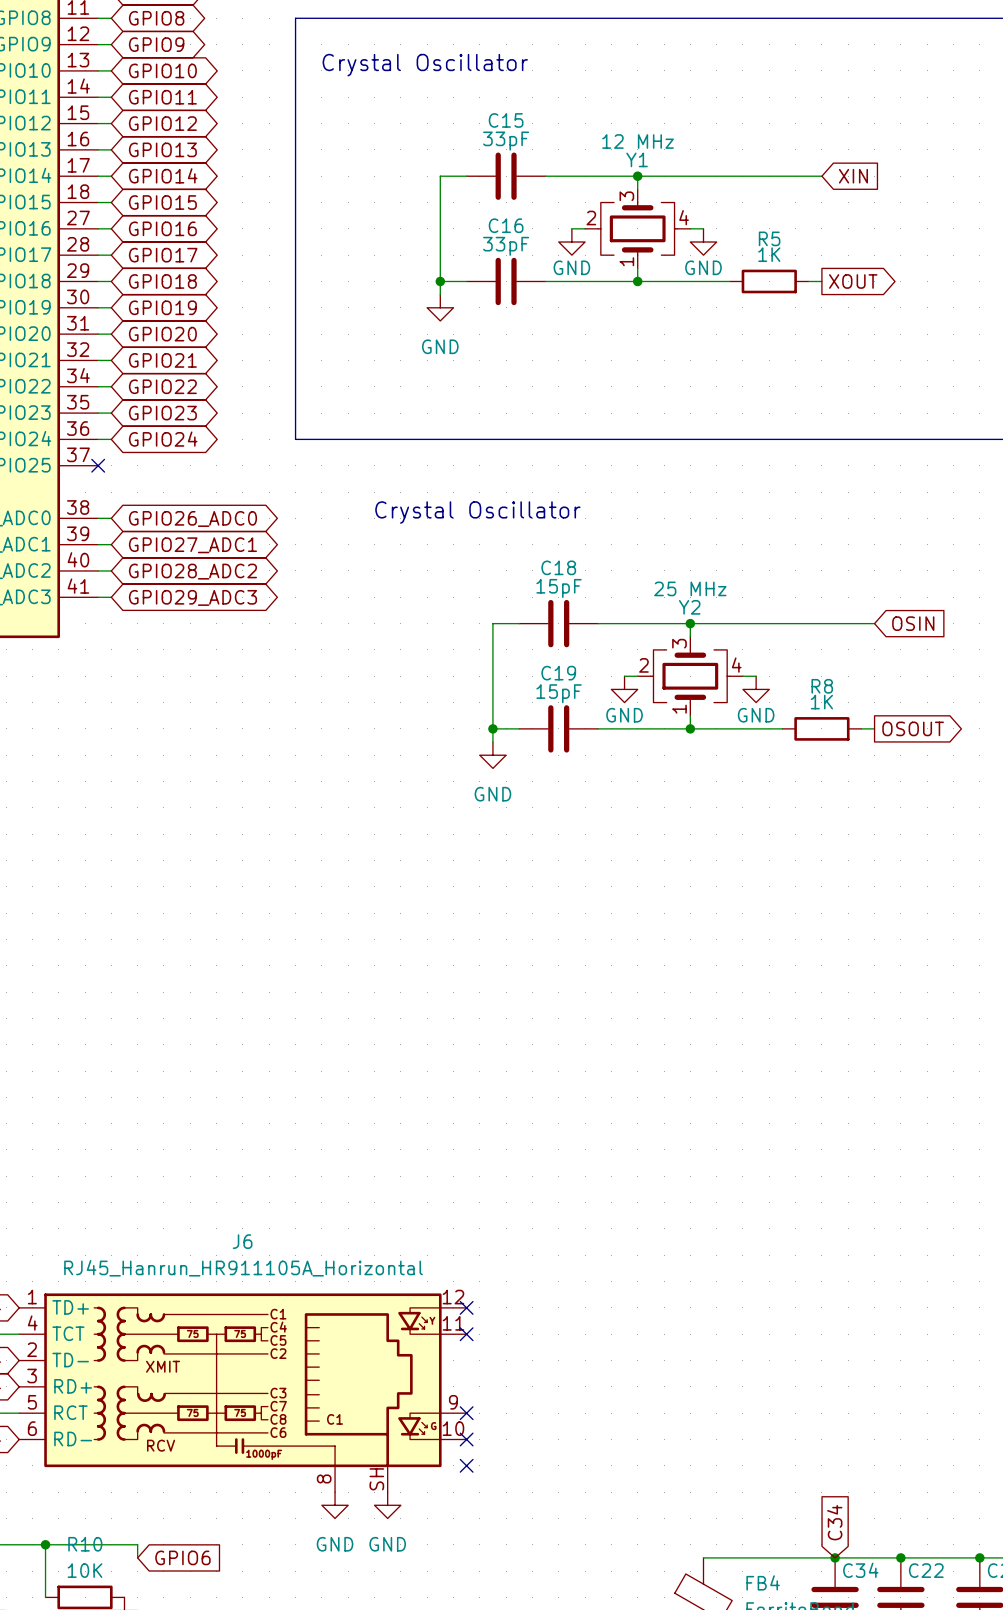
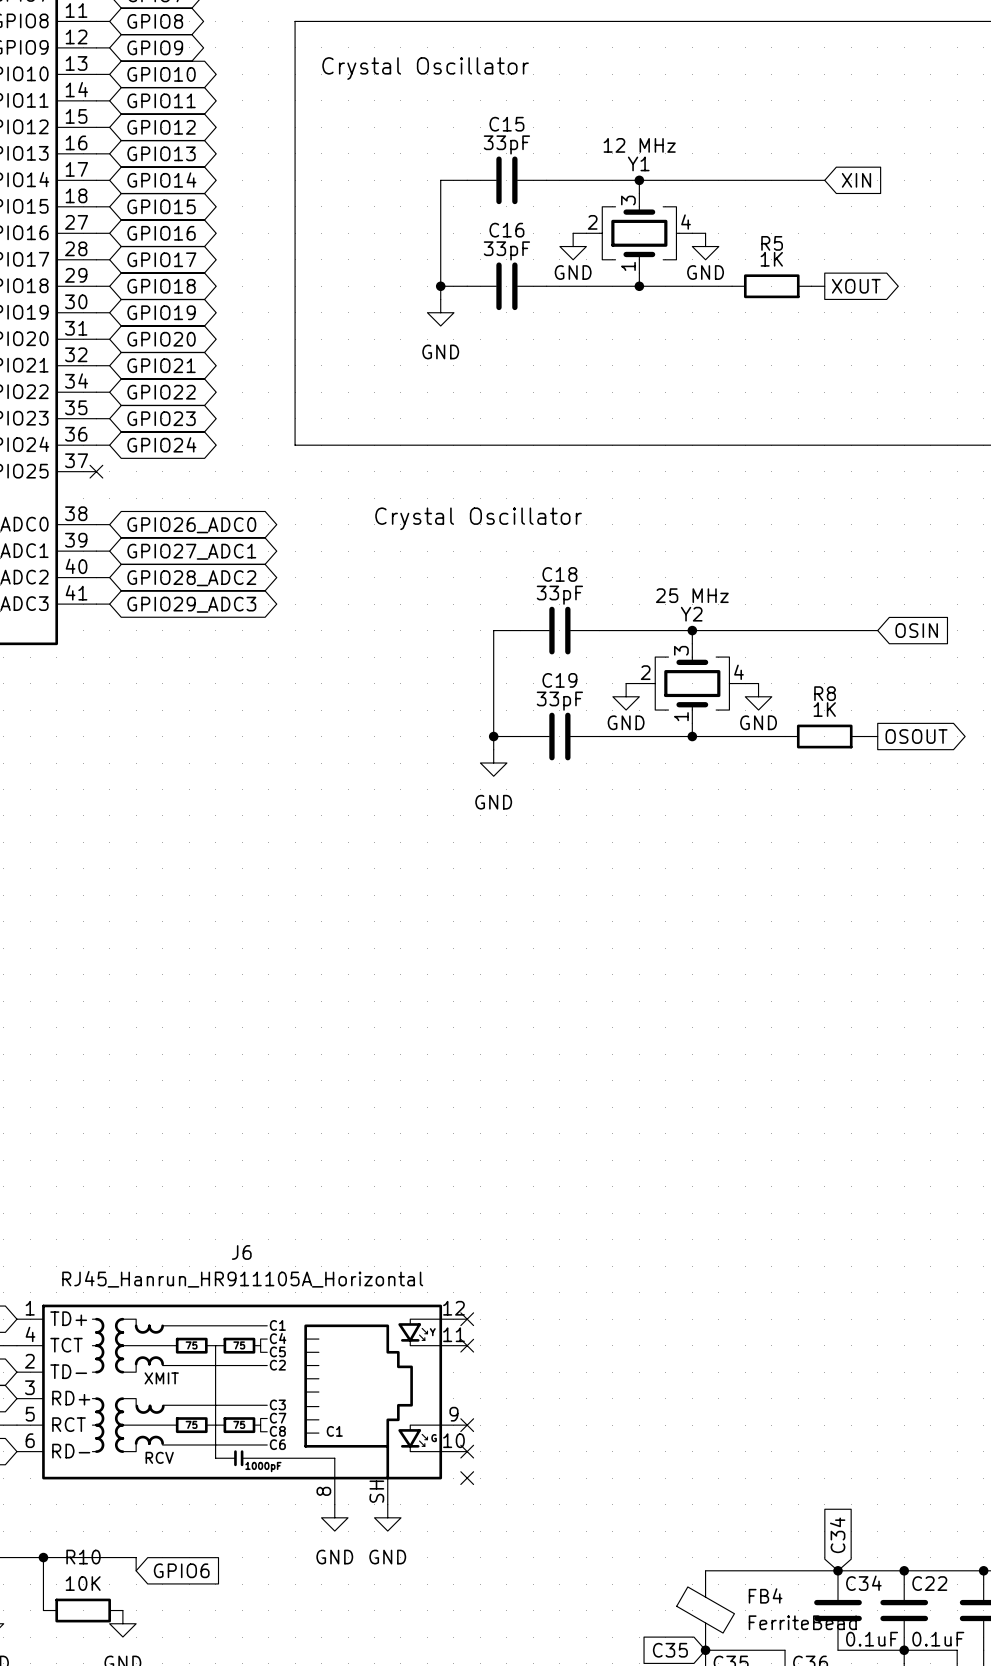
C18 value: 15pF (559, 588) -> 33pF (559, 595)
C19 value: 15pF (559, 693) -> 33pF (559, 701)

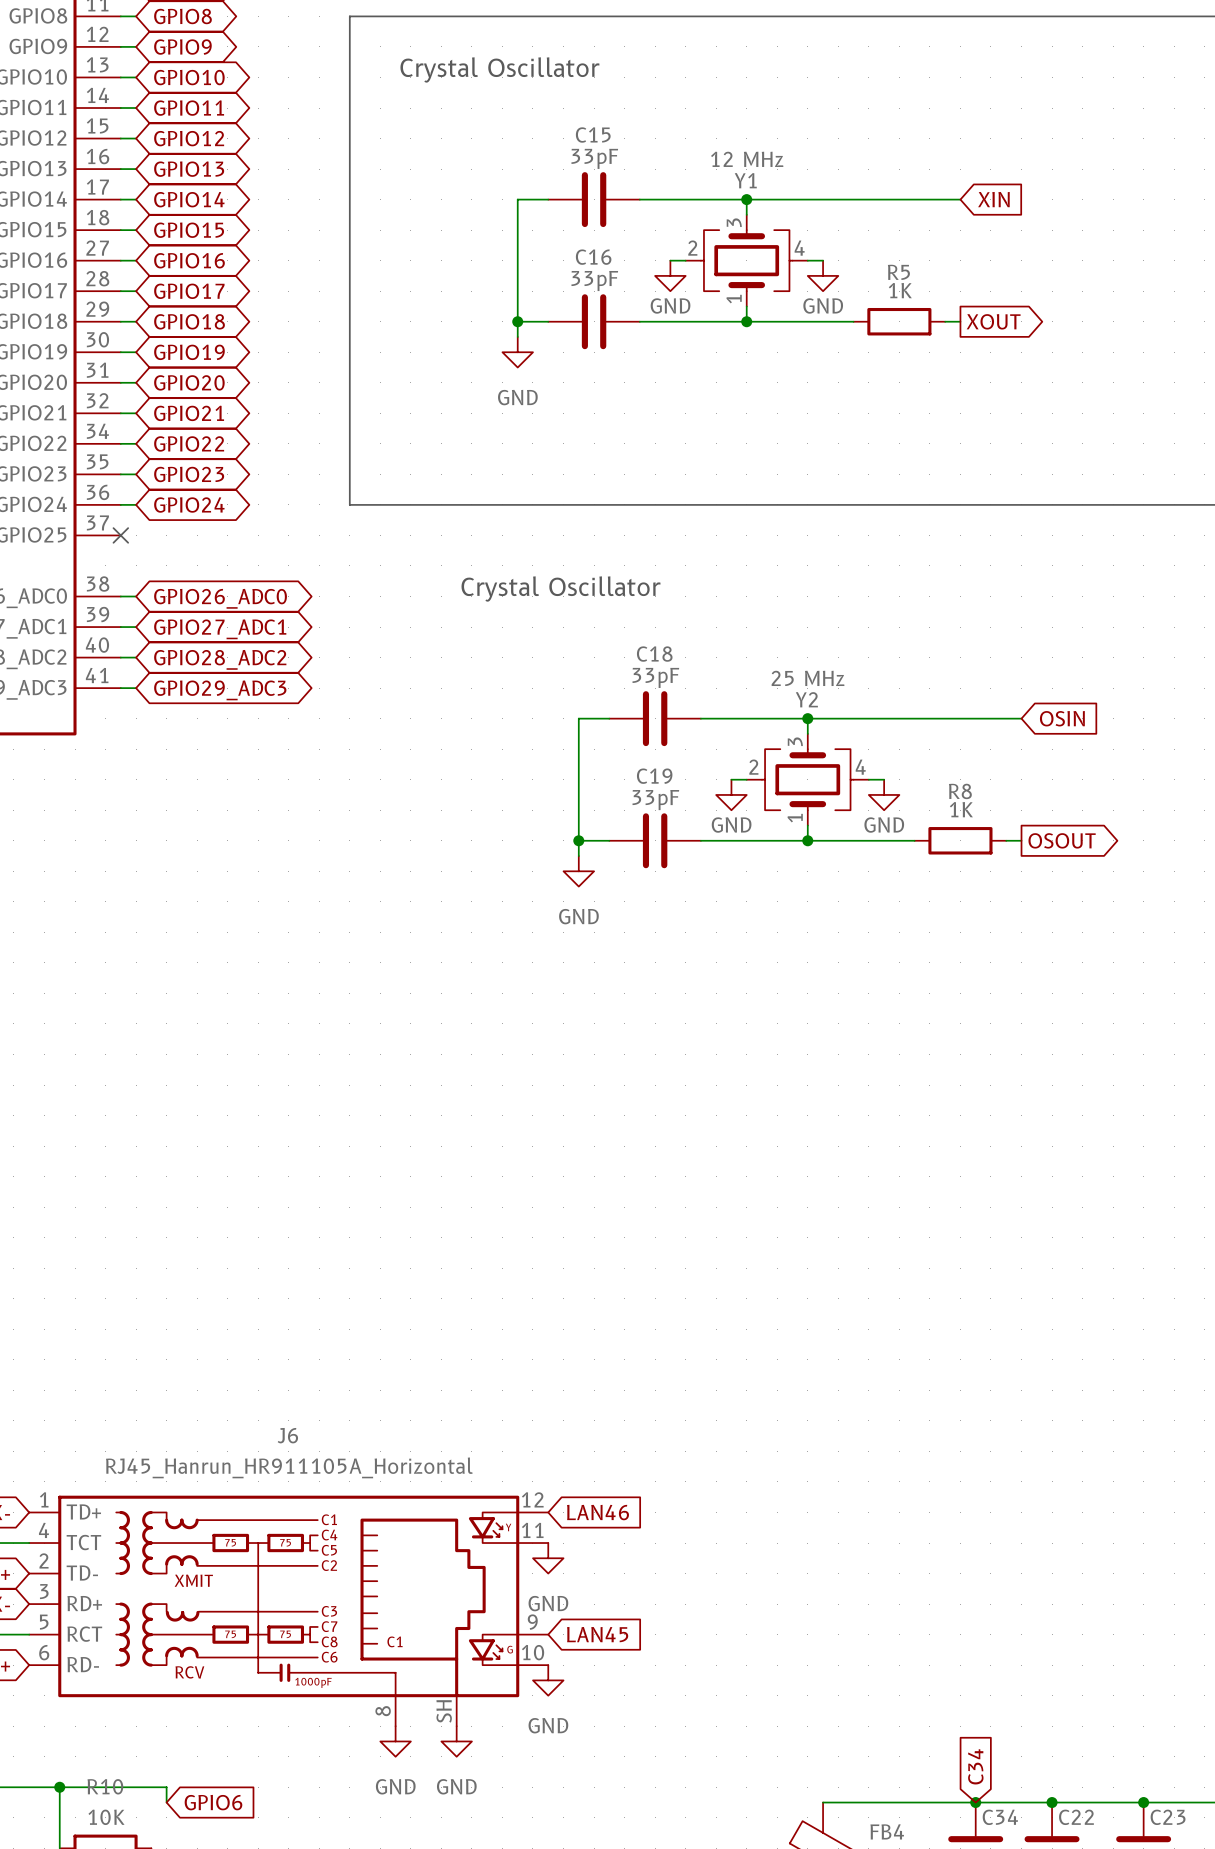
global label: none -> LAN46 (598, 1512)
no-connect mark: (467, 1319) -> none
no-connect mark: (467, 1345) -> none
power symbol: none -> GND (548, 1558)
global label: none -> LAN45 (597, 1634)
no-connect mark: (467, 1425) -> none
no-connect mark: (467, 1451) -> none
power symbol: none -> GND (548, 1680)
no-connect mark: (467, 1478) -> none

